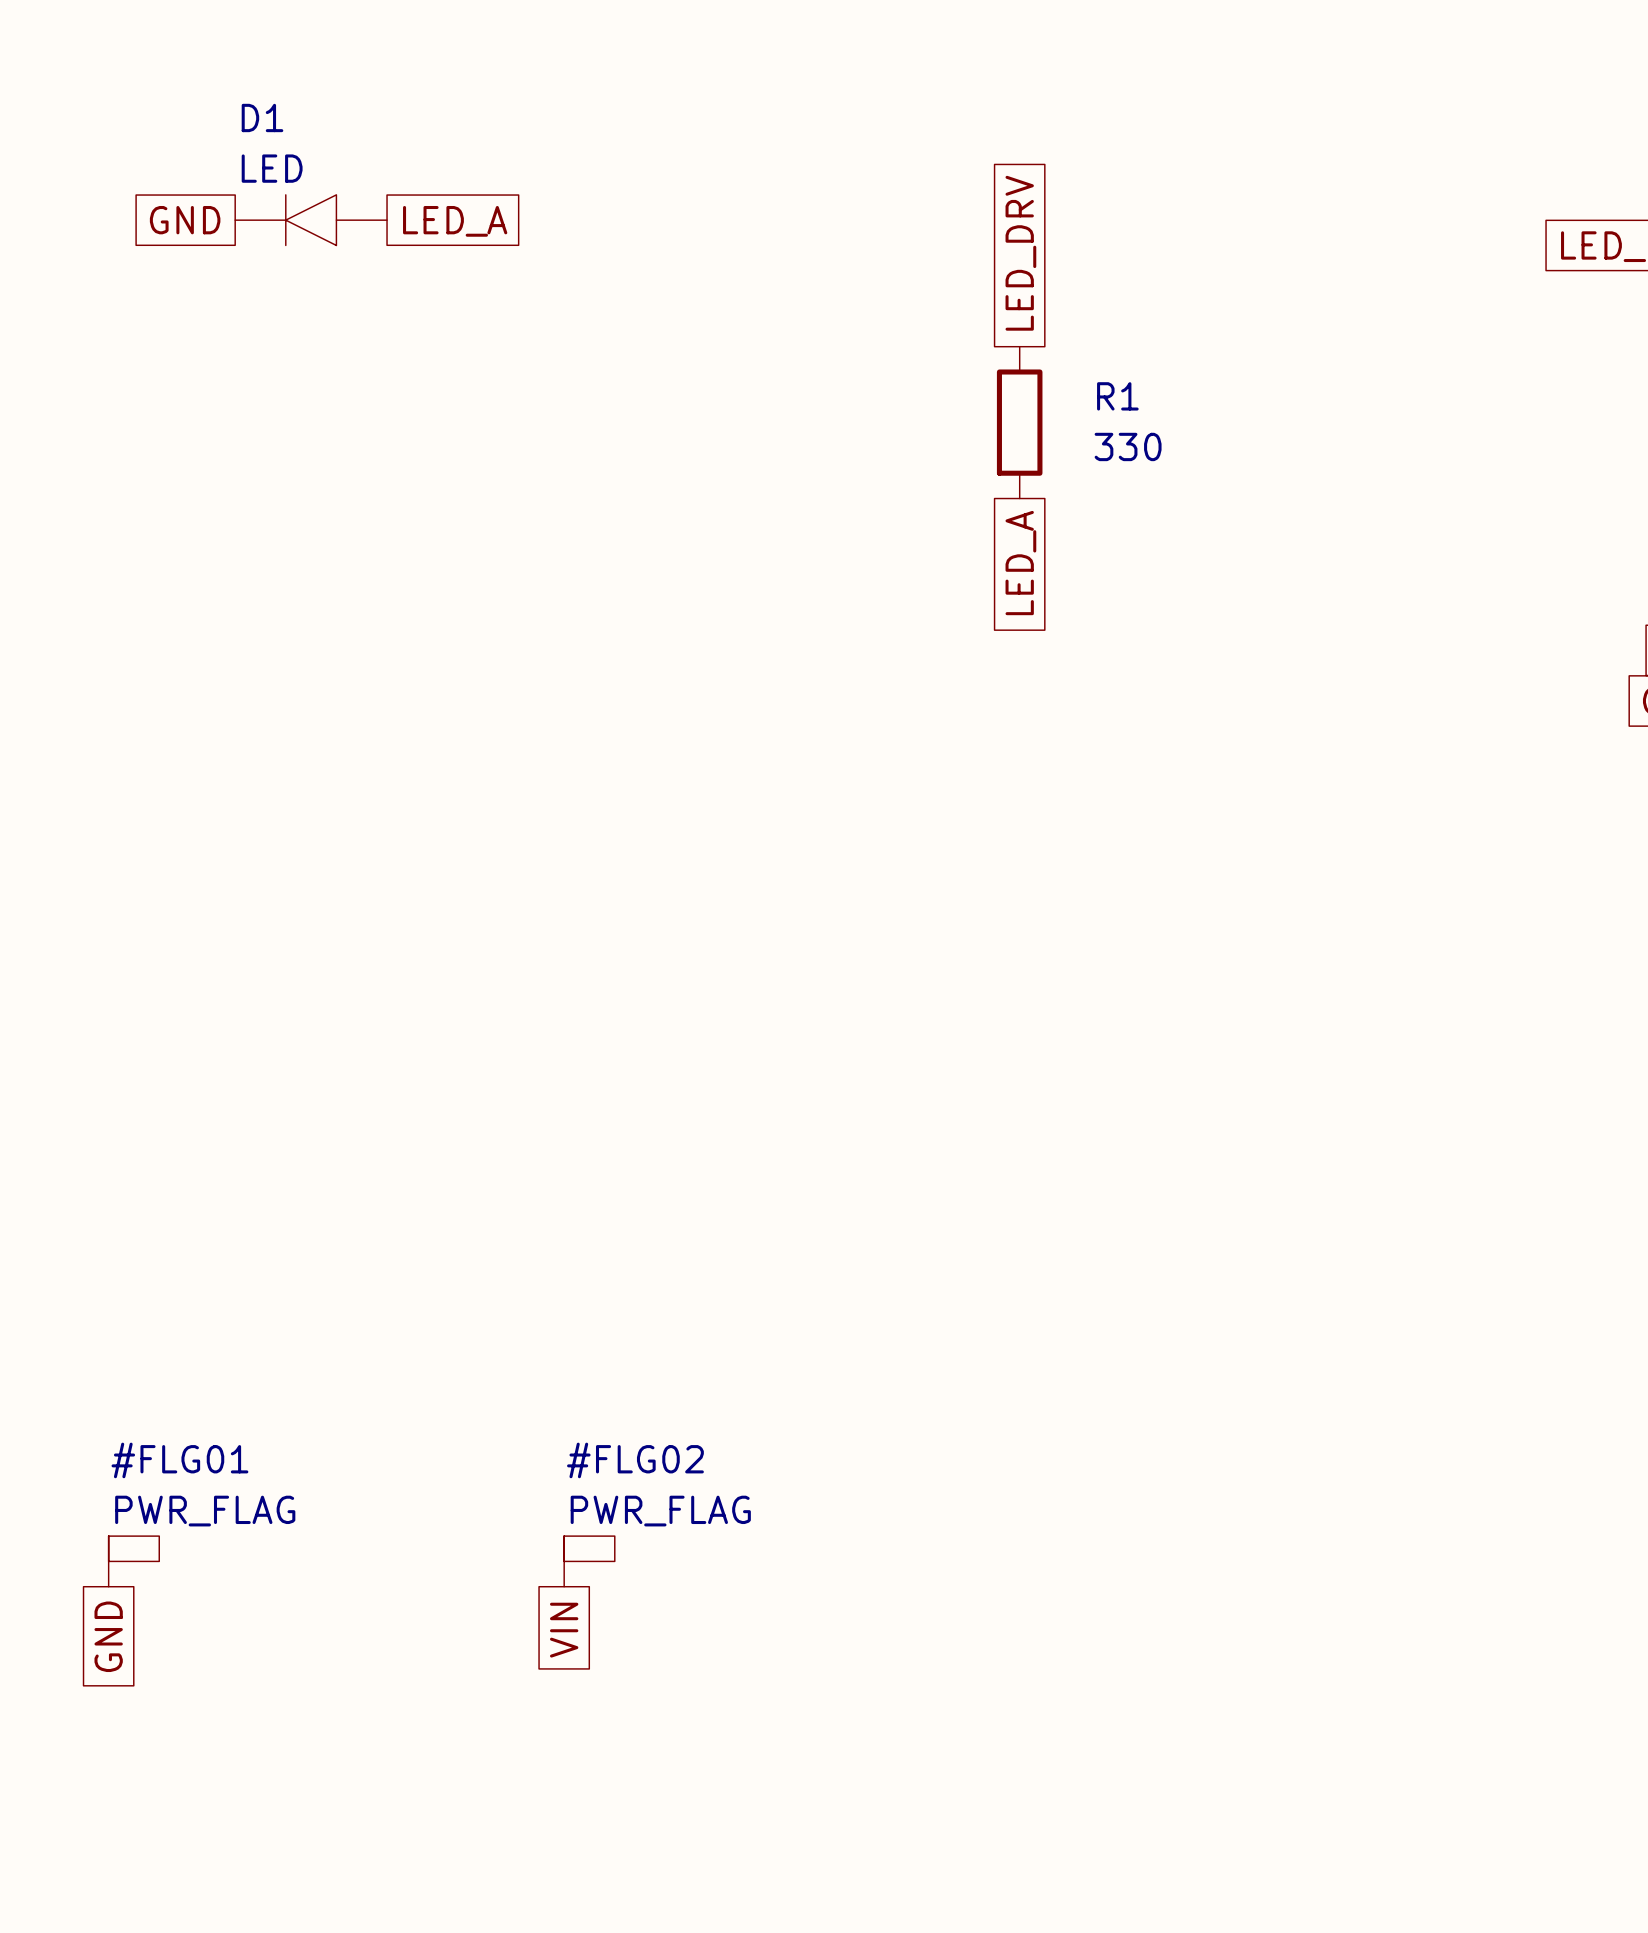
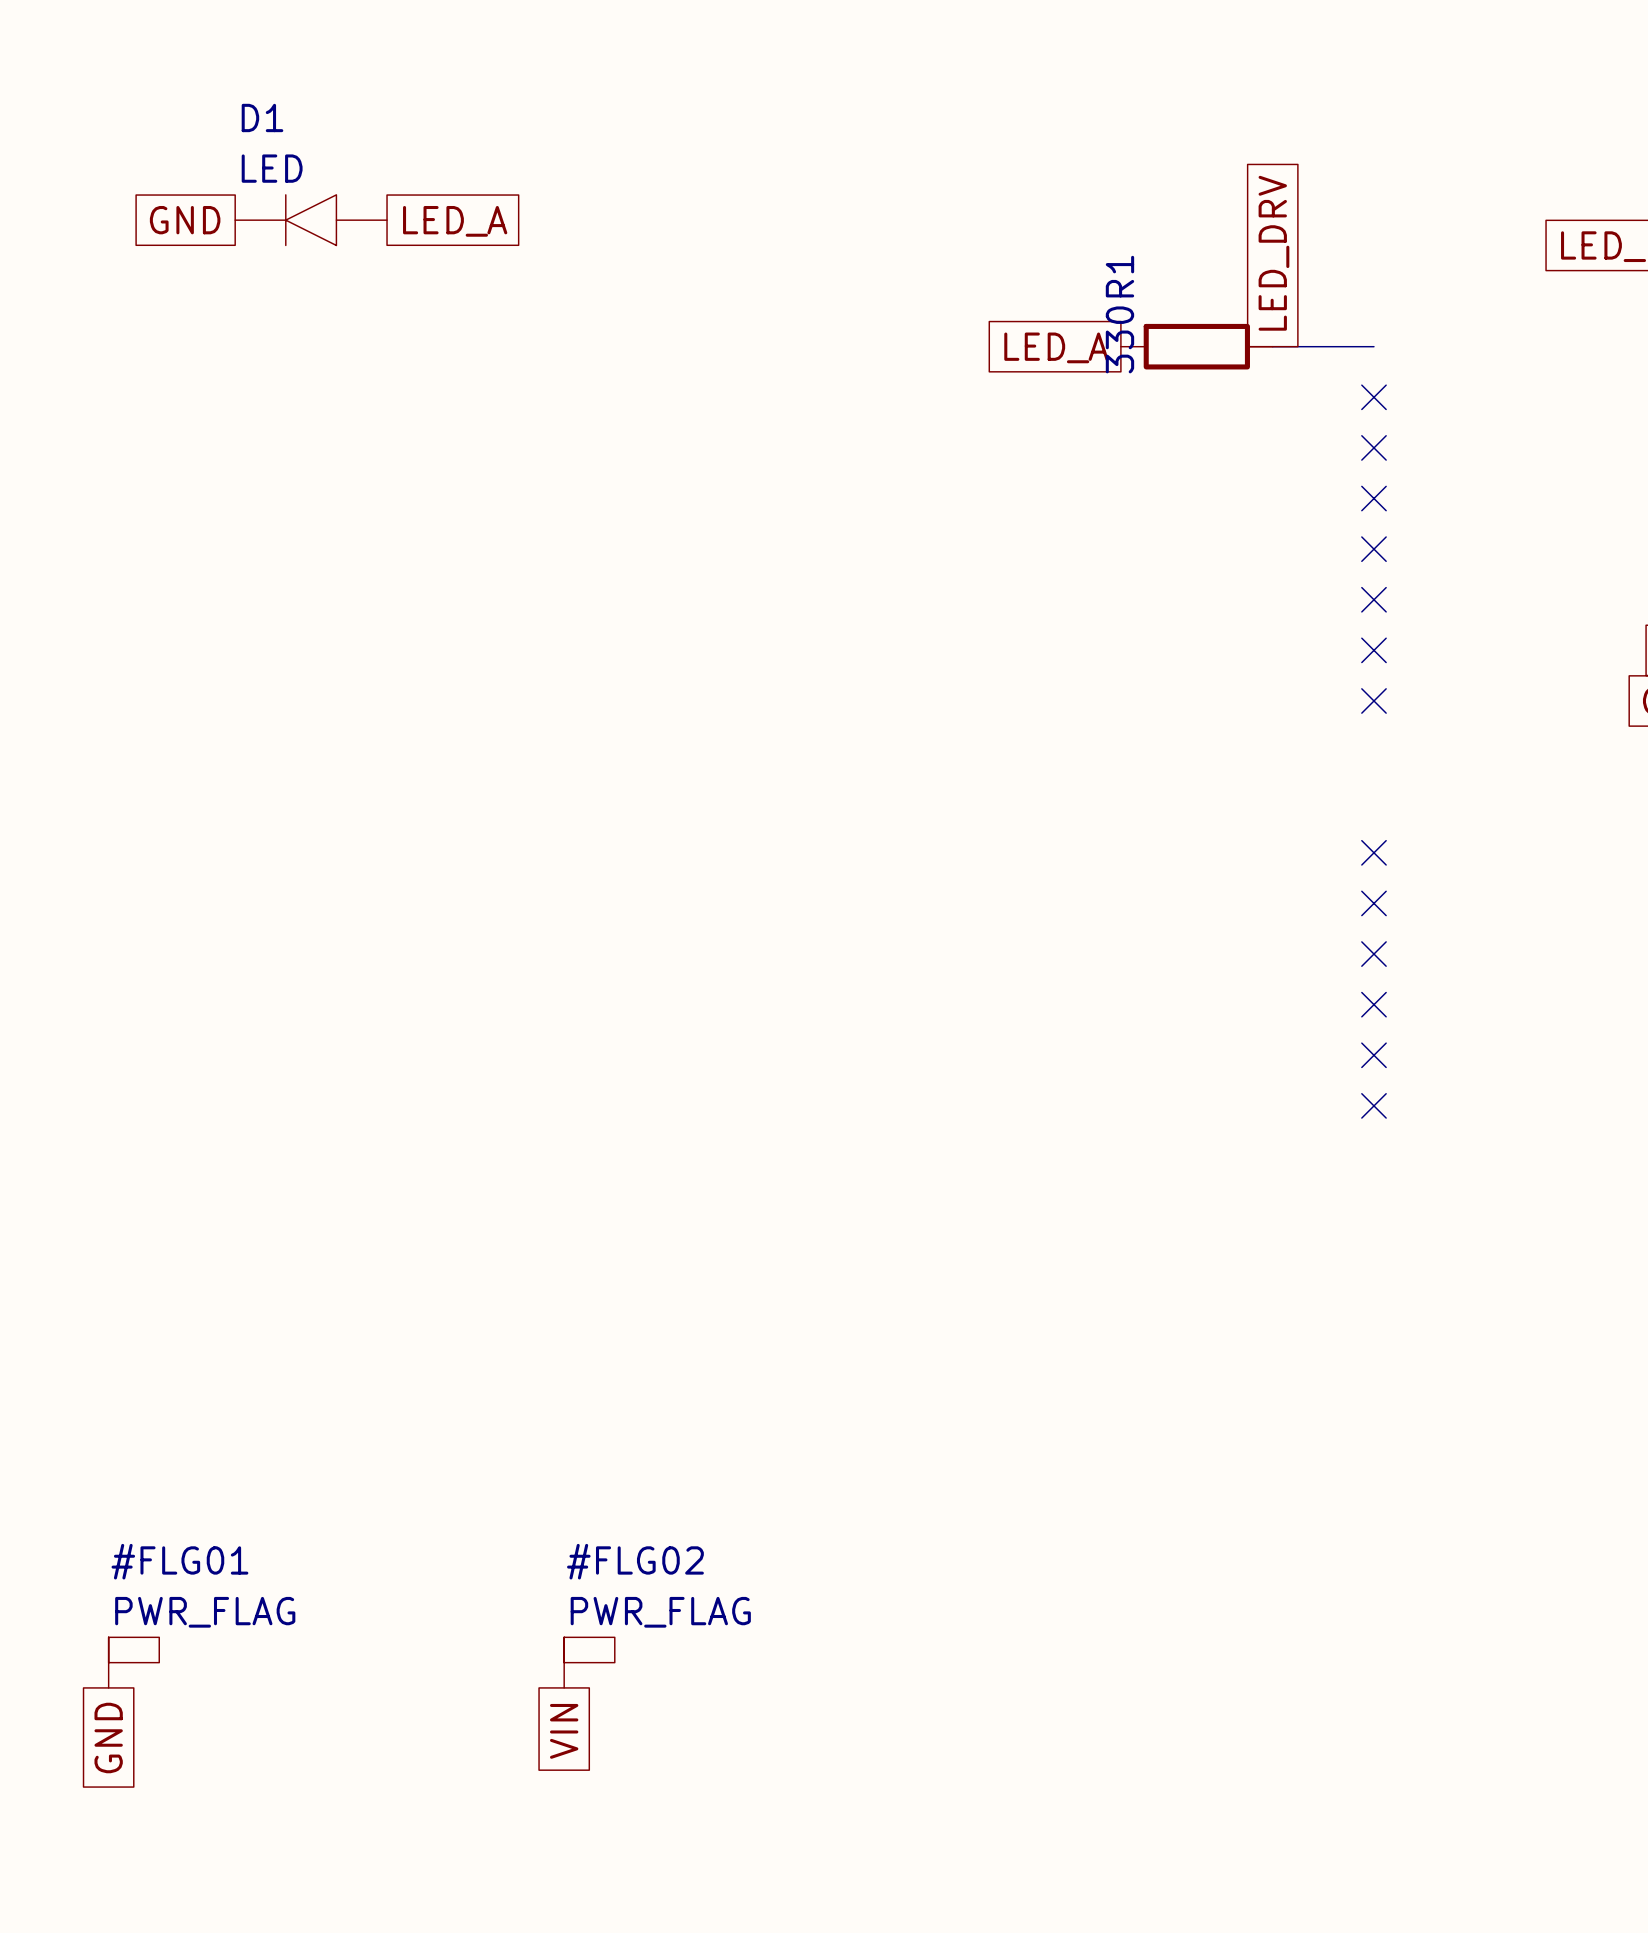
global label position: LED_DRV (1020, 253) -> LED_DRV (1273, 253)
wire: none -> (1272, 346) (1373, 346)
R1 name position: R1 (1117, 396) -> R1 (1119, 276)
no-connect mark: none -> (1373, 397)
R1 rotation: 0° (1019, 422) -> 90° clockwise (1196, 346)
R1 position: (1019, 422) -> (1196, 346)
R1 value position: 330 (1128, 446) -> 330 (1119, 339)
no-connect mark: none -> (1373, 447)
no-connect mark: none -> (1373, 498)
no-connect mark: none -> (1373, 549)
global label rotation: 0° (1020, 563) -> 90° clockwise (1056, 347)
global label position: LED_A (1020, 563) -> LED_A (1056, 347)
no-connect mark: none -> (1373, 599)
no-connect mark: none -> (1373, 650)
no-connect mark: none -> (1373, 700)
no-connect mark: none -> (1373, 852)
no-connect mark: none -> (1373, 903)
no-connect mark: none -> (1373, 954)
no-connect mark: none -> (1373, 1004)
no-connect mark: none -> (1373, 1055)
no-connect mark: none -> (1373, 1105)
#FLG01 position: PWR_FLAG (133, 1561) -> PWR_FLAG (133, 1662)
#FLG02 position: PWR_FLAG (589, 1561) -> PWR_FLAG (589, 1662)
global label position: VIN (564, 1630) -> VIN (564, 1731)
global label position: GND (108, 1636) -> GND (108, 1738)

